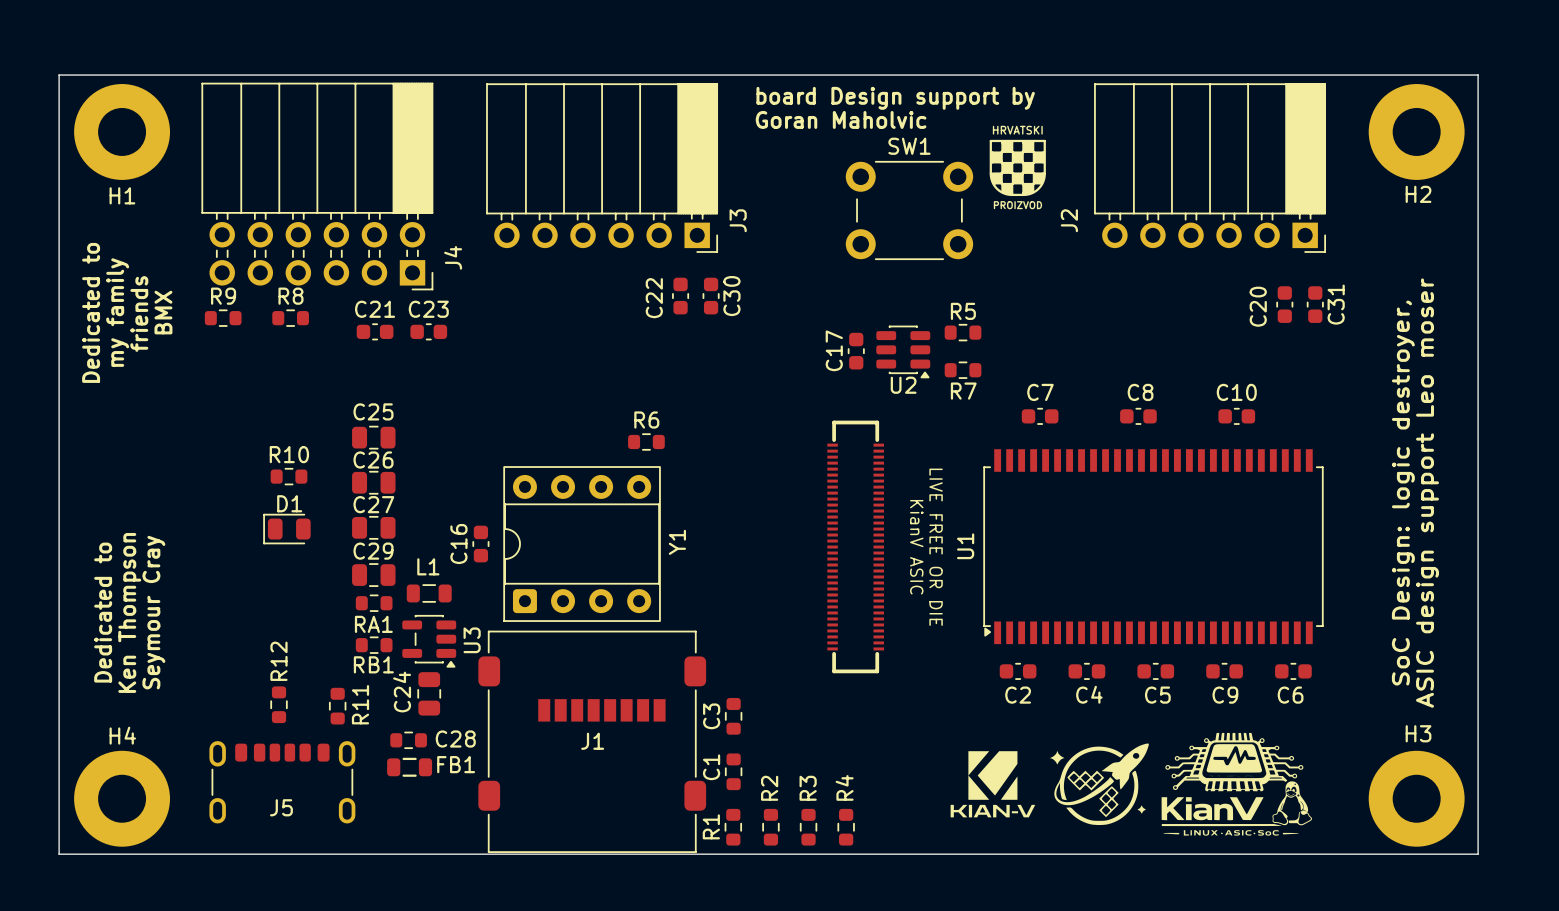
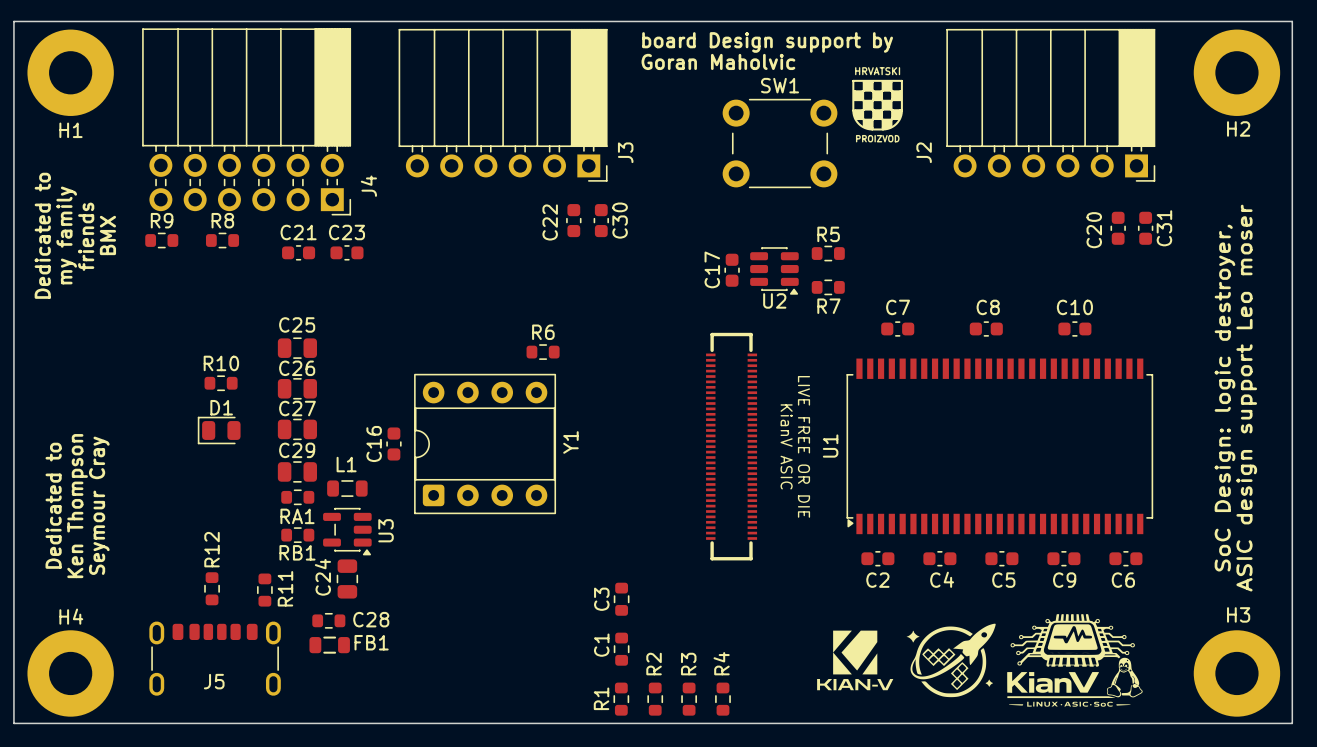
J1: (592, 741) -> none

